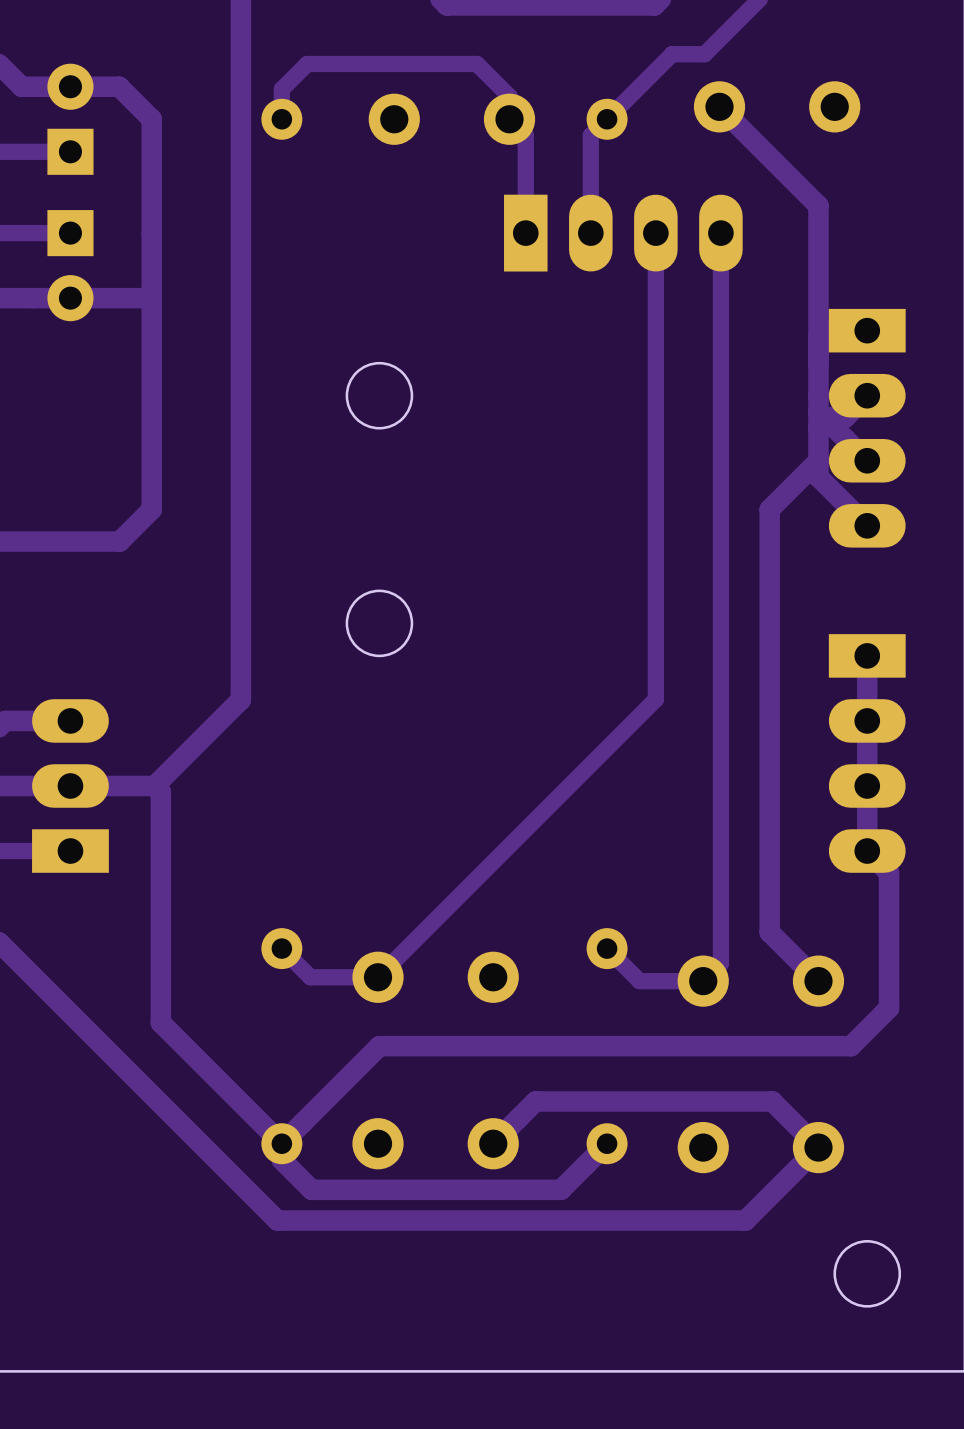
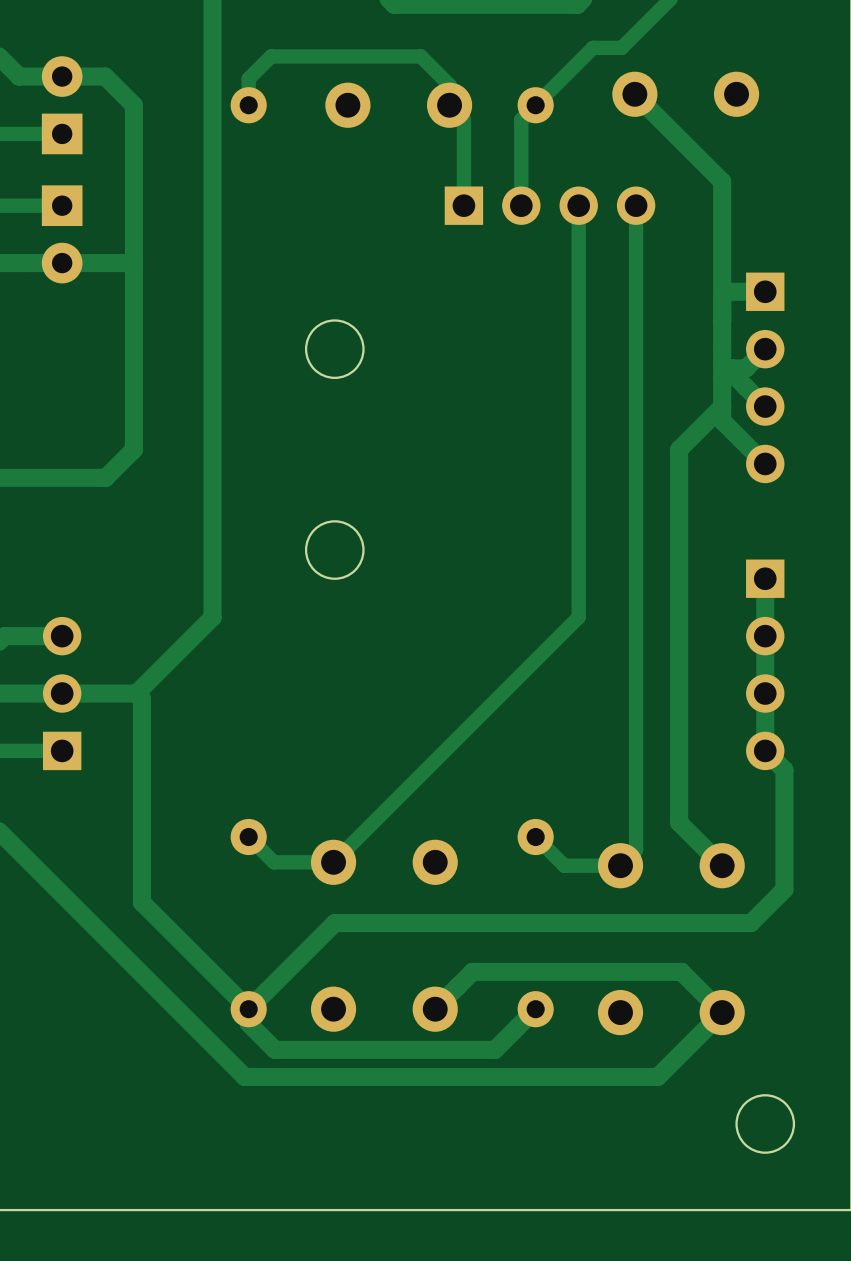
part footprint: [504, 194, 743, 272] -> [444, 186, 656, 225]
part footprint: [828, 308, 906, 548] -> [746, 272, 785, 484]
part footprint: [828, 634, 906, 873] -> [746, 559, 785, 771]
part footprint: [32, 699, 109, 873] -> [42, 616, 82, 771]

